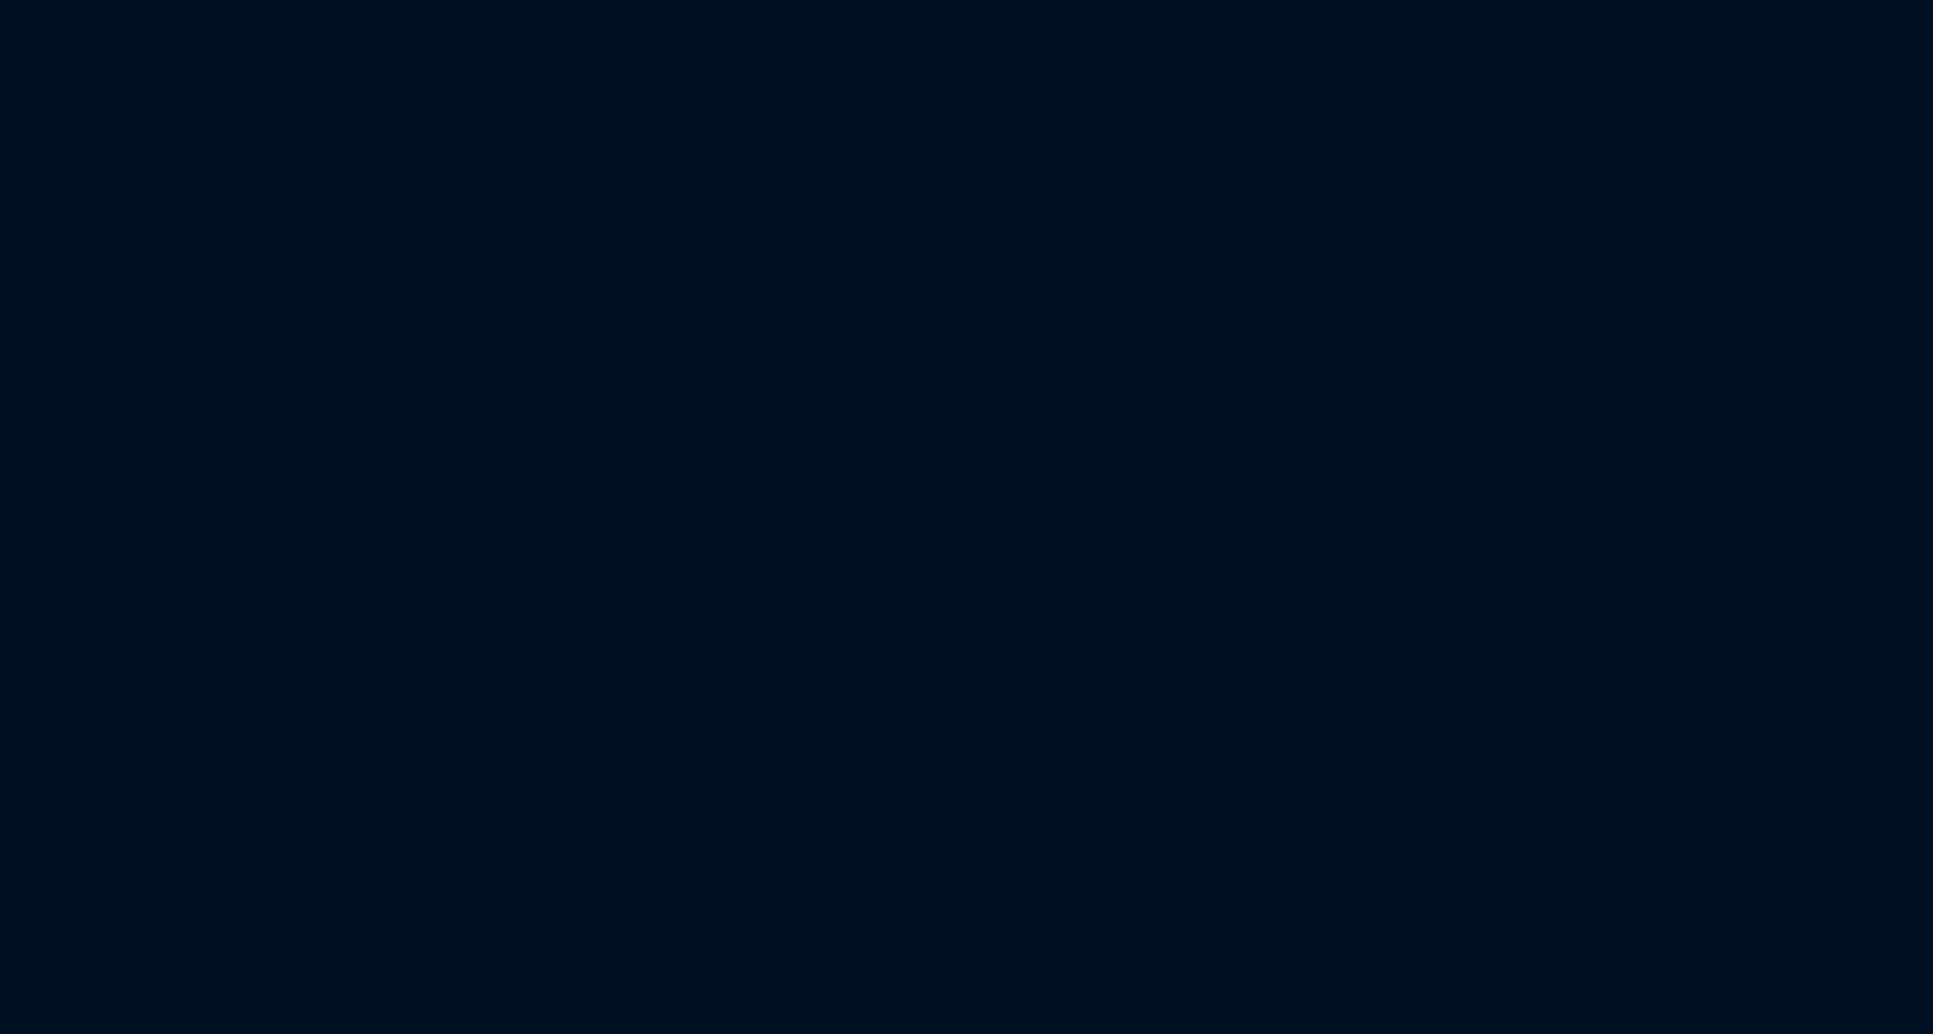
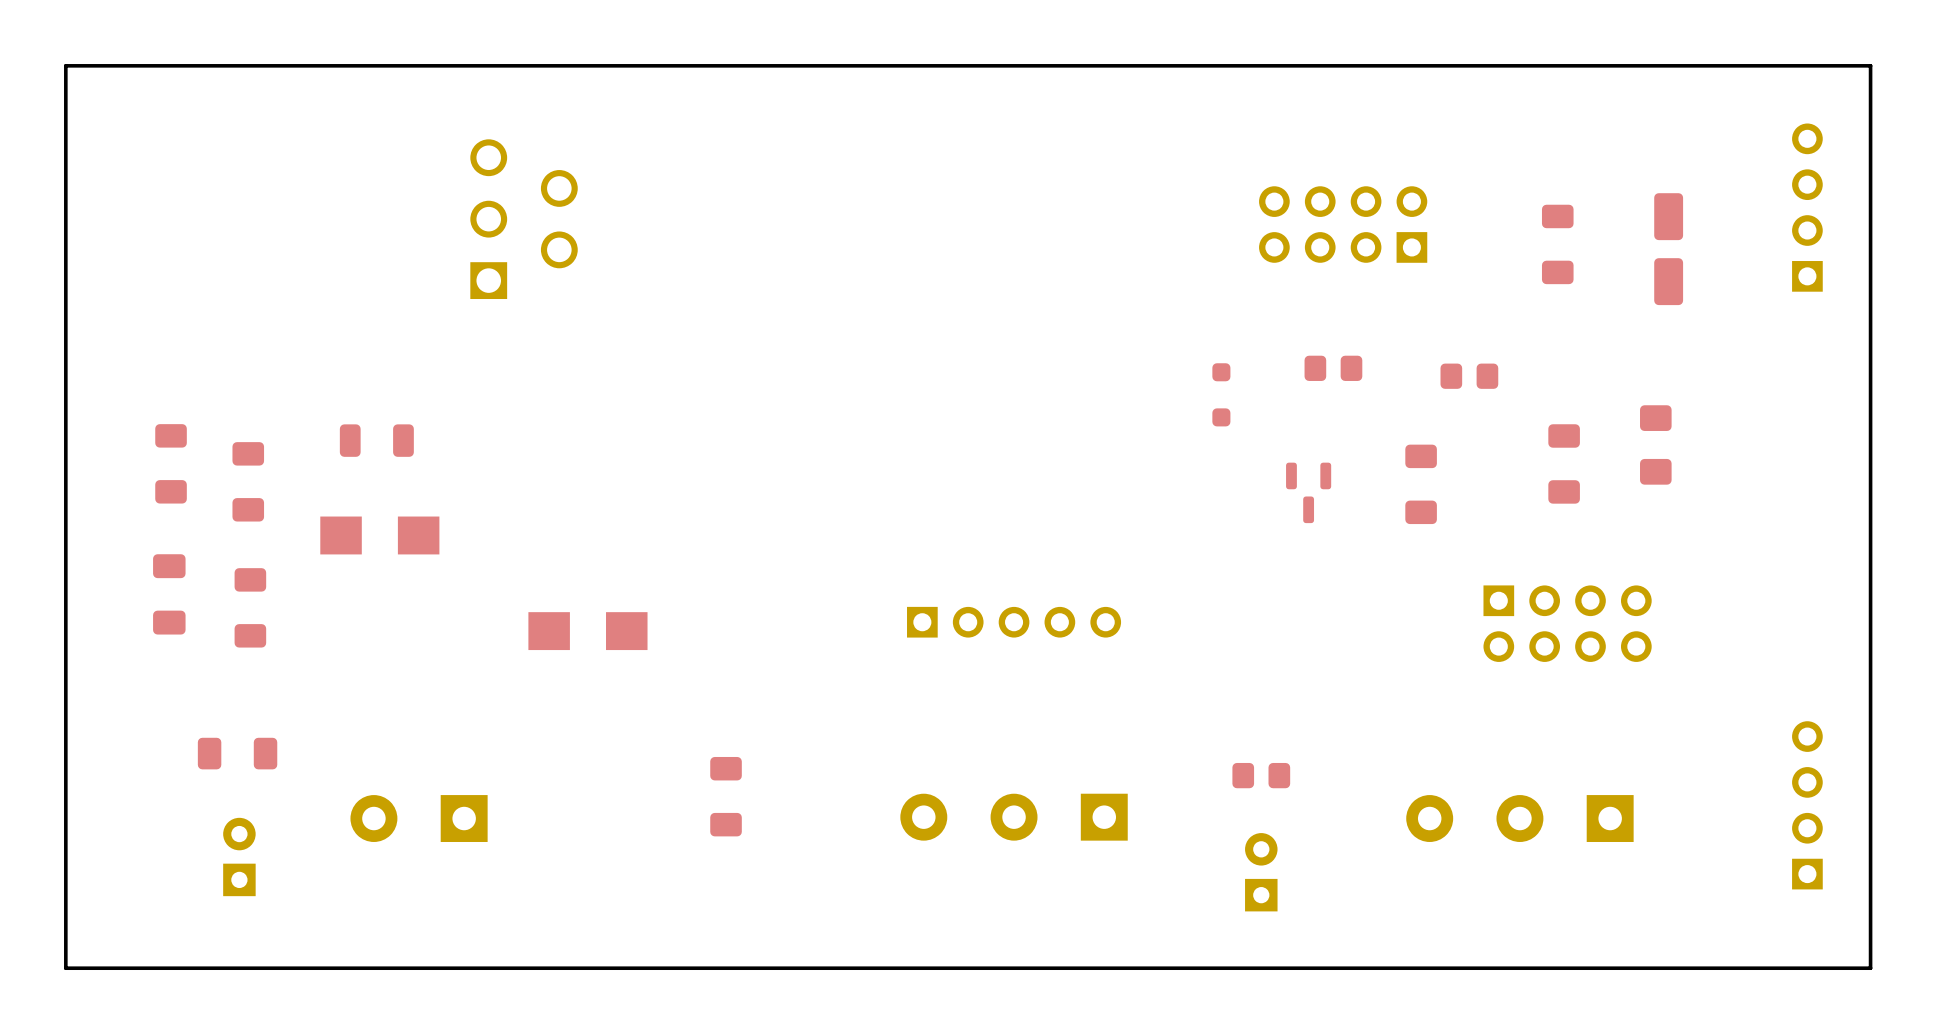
board edge: none -> (1870, 65) (65, 65) (65, 968) (1870, 968) (1870, 65)
part: none -> (1807, 207)
part: none -> (524, 219)
part: none -> (1343, 224)
part: none -> (1557, 244)
part: none -> (1668, 249)
part: none -> (1333, 368)
part: none -> (1469, 376)
part: none -> (1221, 394)
part: none -> (376, 440)
part: none -> (1655, 444)
part: none -> (171, 463)
part: none -> (1564, 463)
part: none -> (248, 481)
part: none -> (1421, 484)
part: none -> (1308, 492)
part: none -> (379, 535)
part: none -> (169, 594)
part: none -> (250, 607)
part: none -> (1014, 622)
part: none -> (1567, 623)
part: none -> (587, 631)
part: none -> (237, 753)
part: none -> (1261, 775)
part: none -> (726, 796)
part: none -> (1807, 805)
part: none -> (1014, 817)
part: none -> (419, 818)
part: none -> (1519, 818)
part: none -> (239, 856)
part: none -> (1261, 872)

